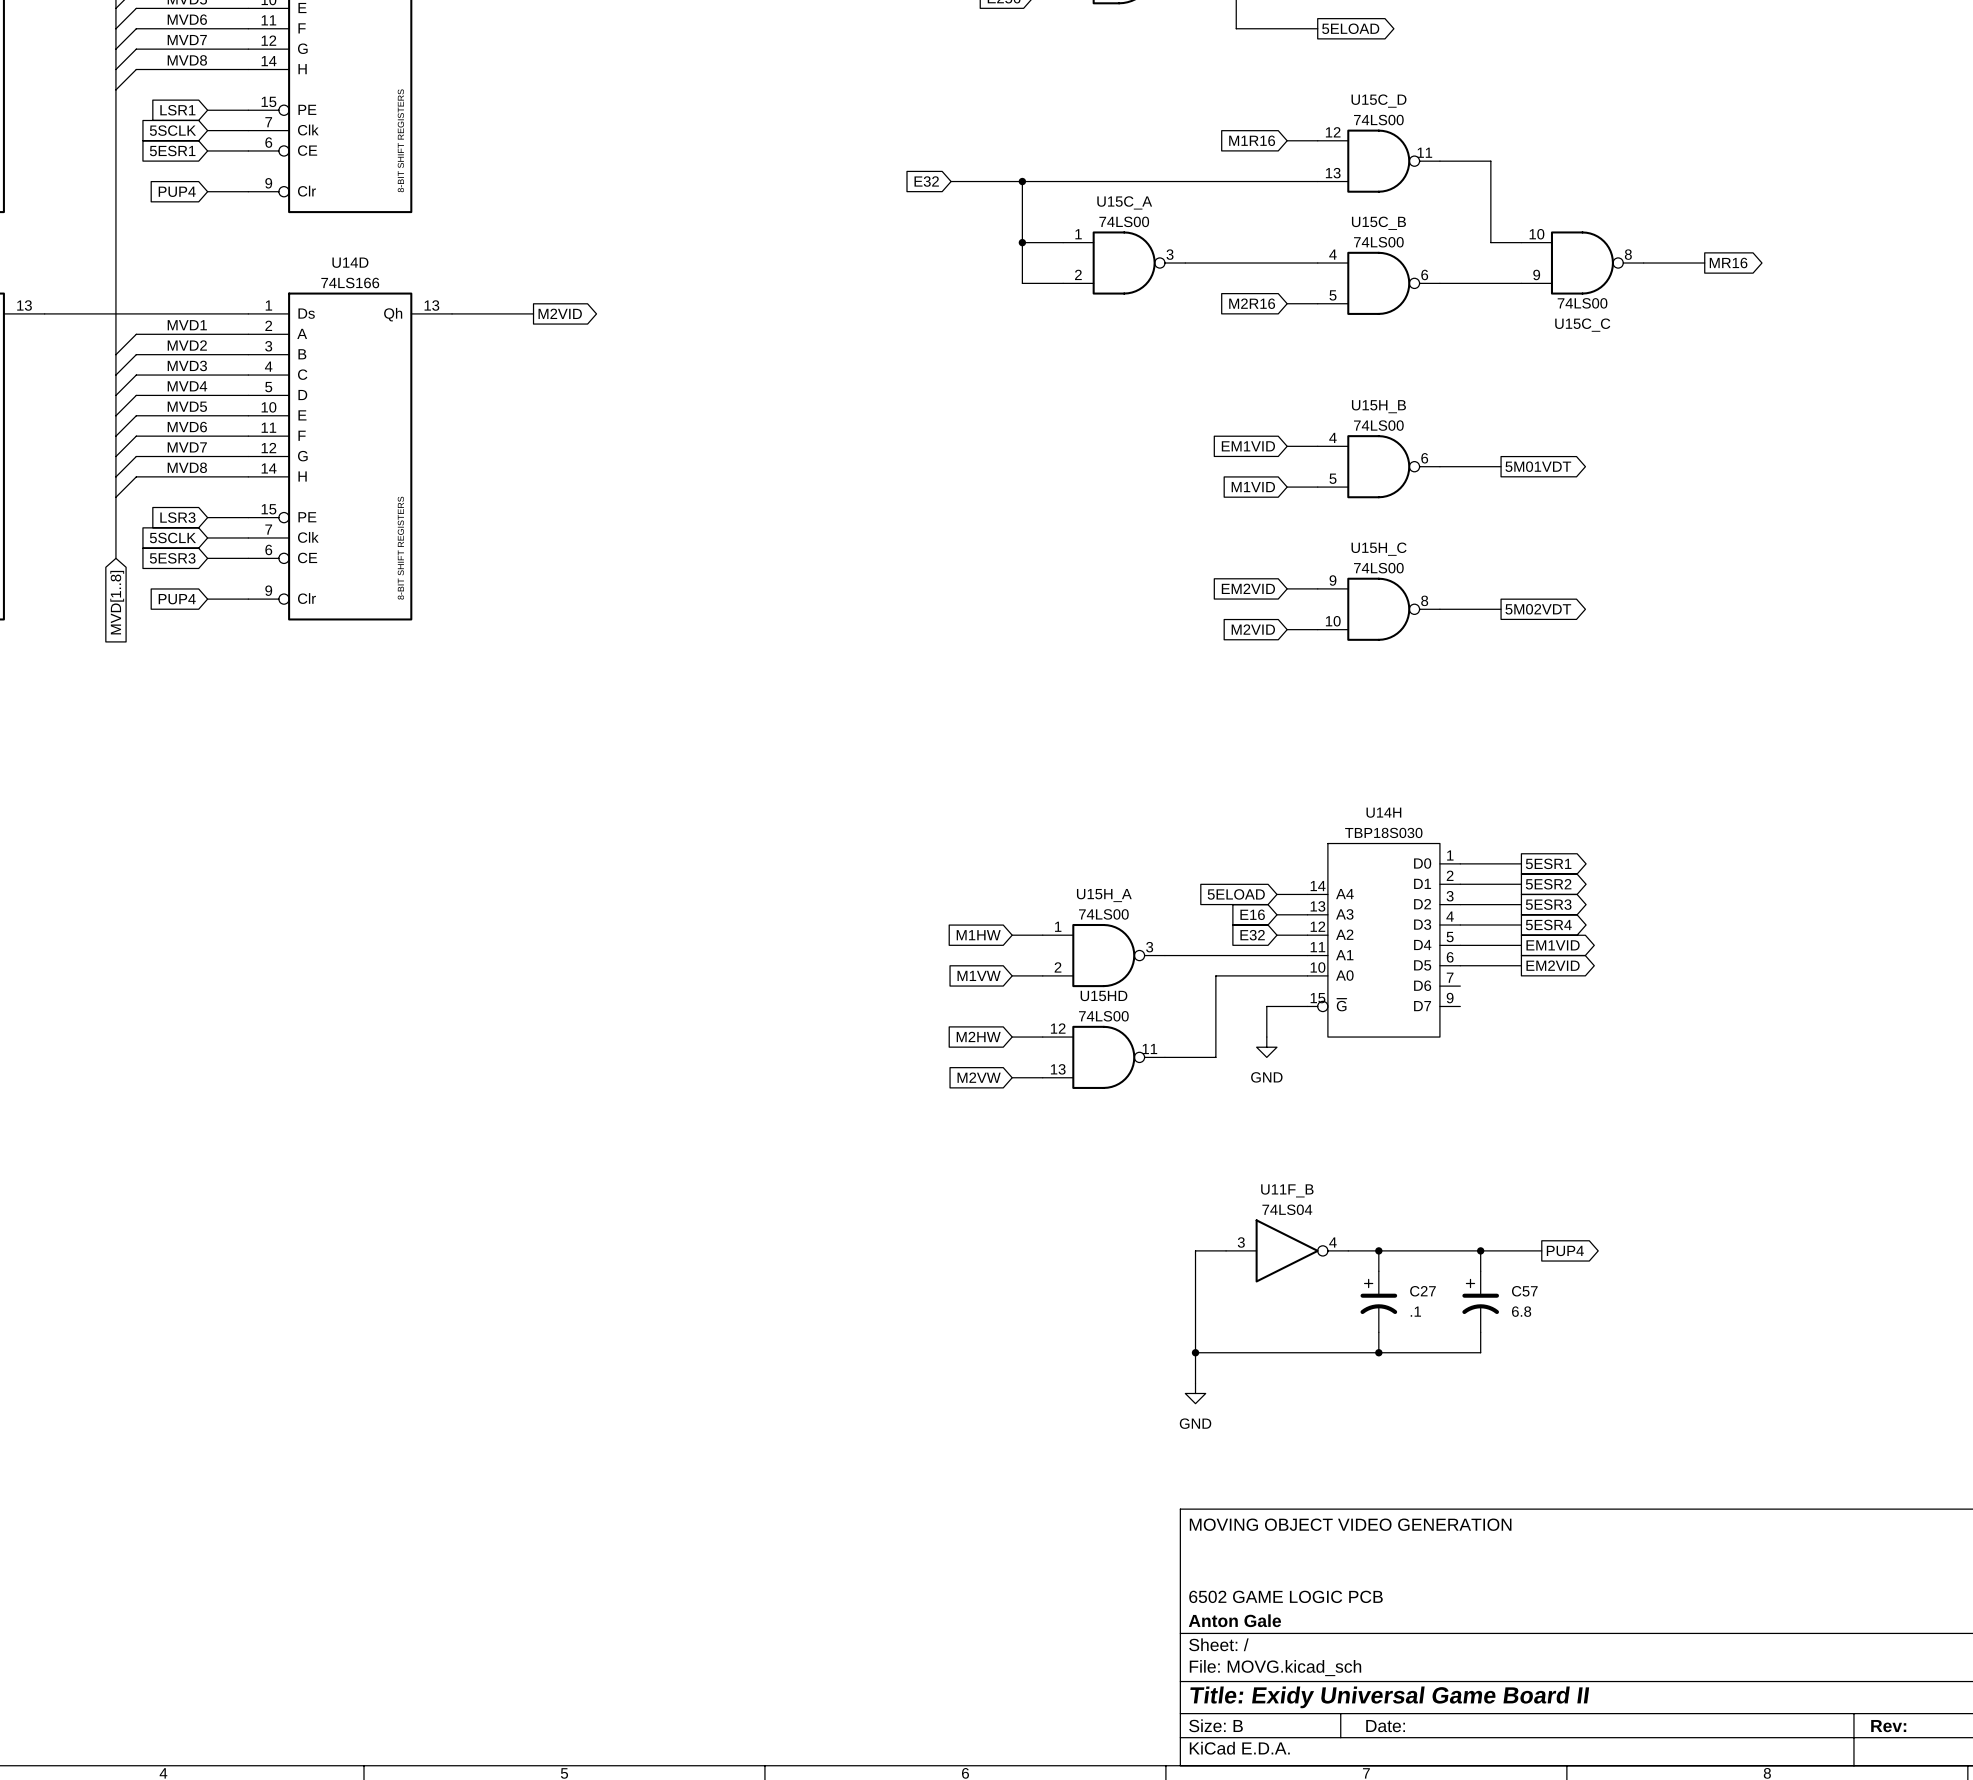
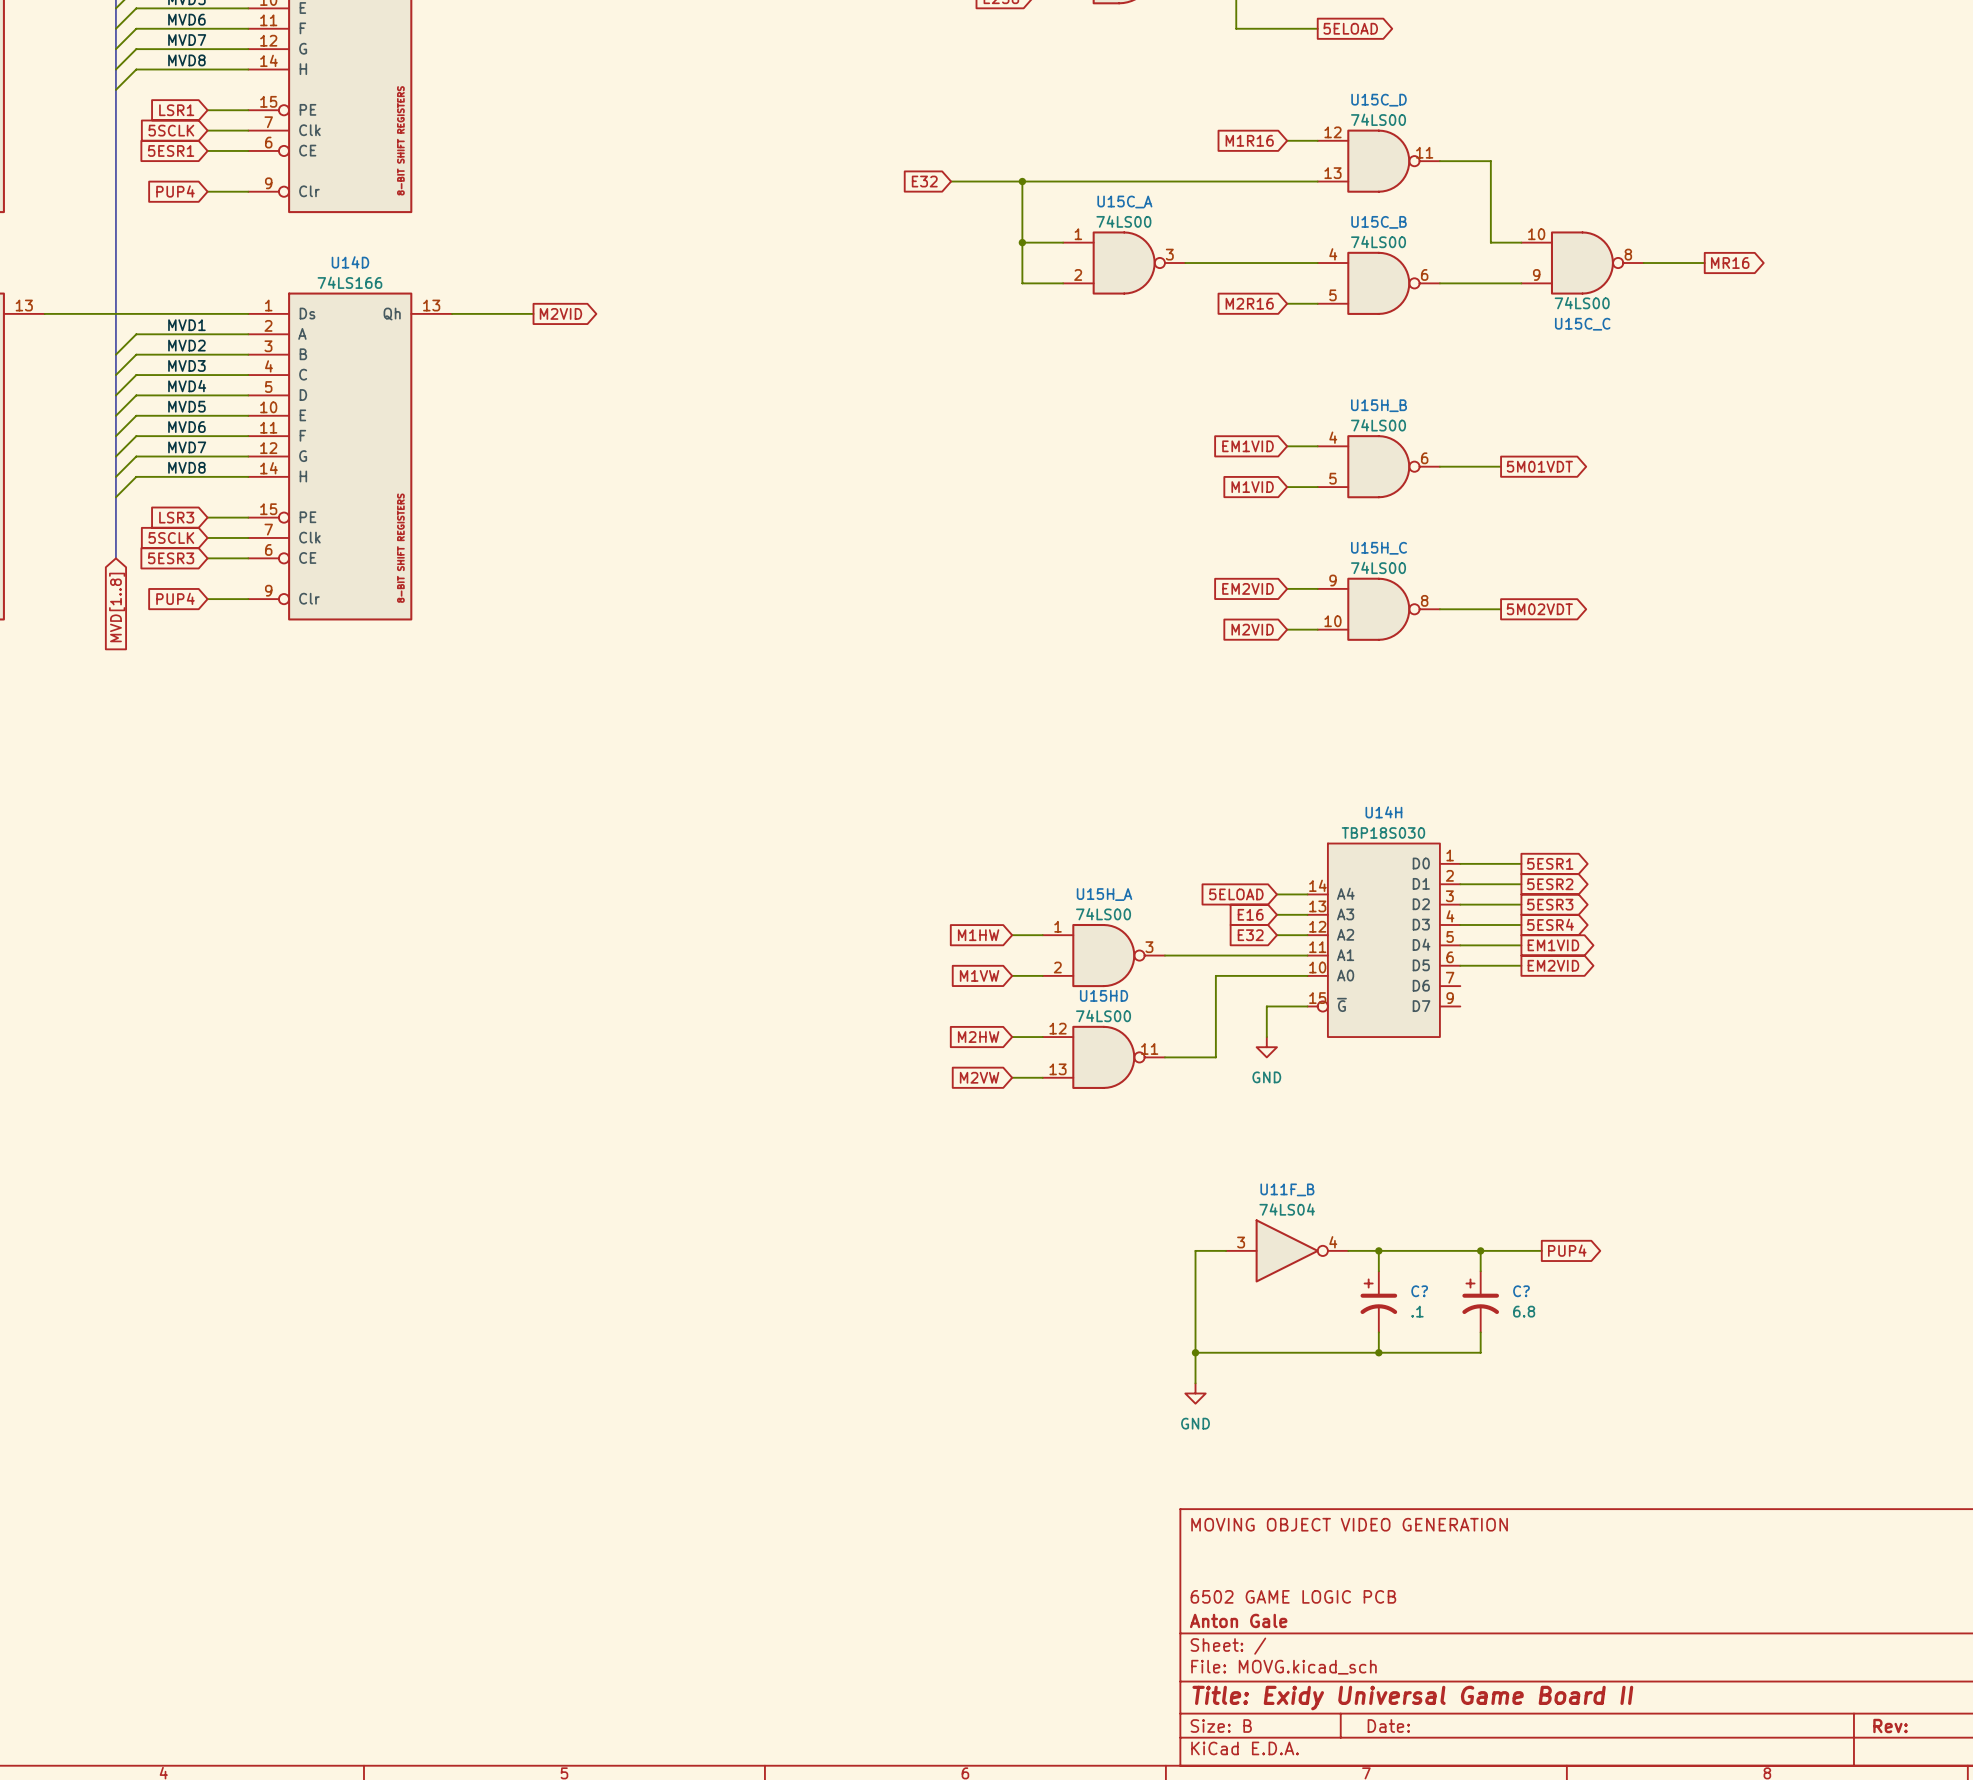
C27 name: C27 (1422, 1291) -> C? (1419, 1291)
C57 name: C57 (1524, 1291) -> C? (1521, 1291)

